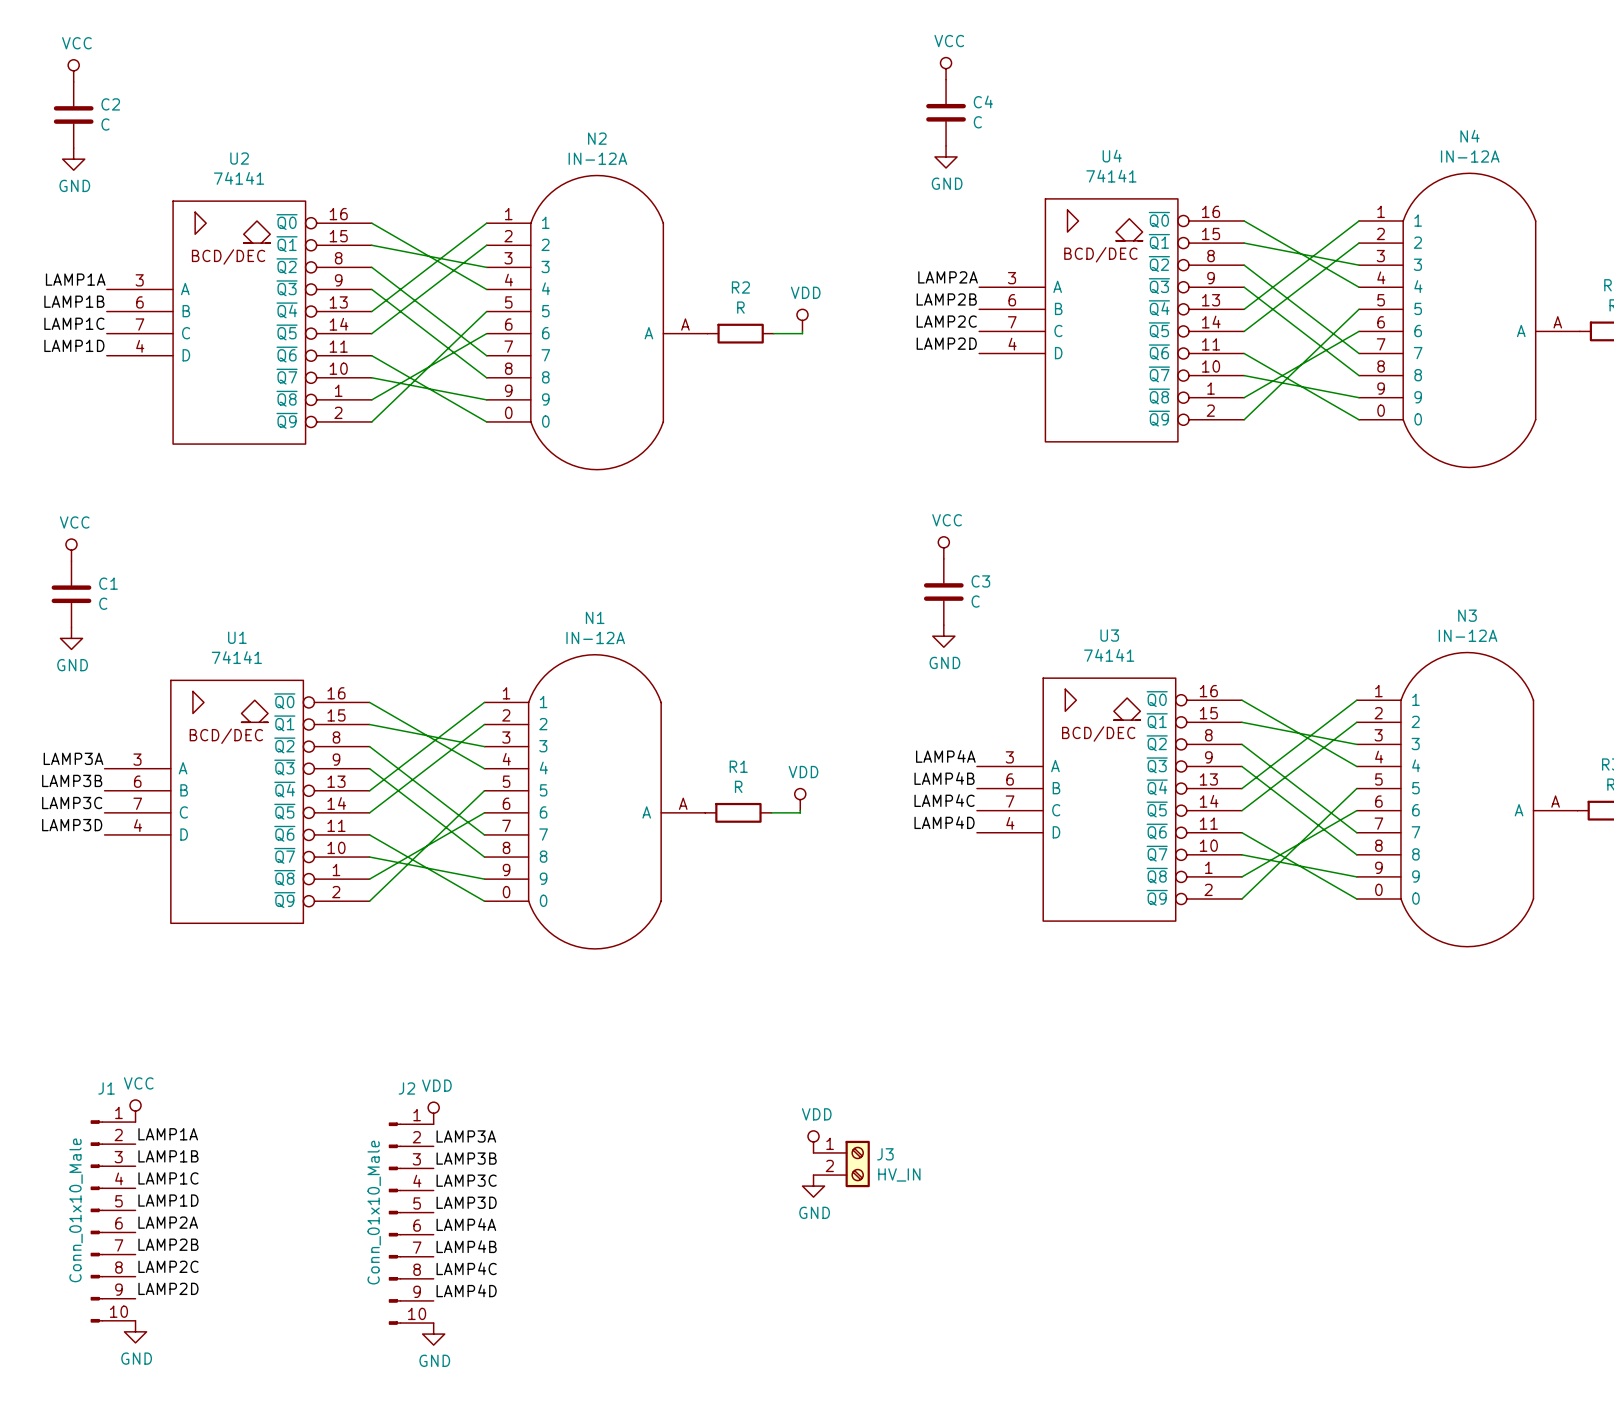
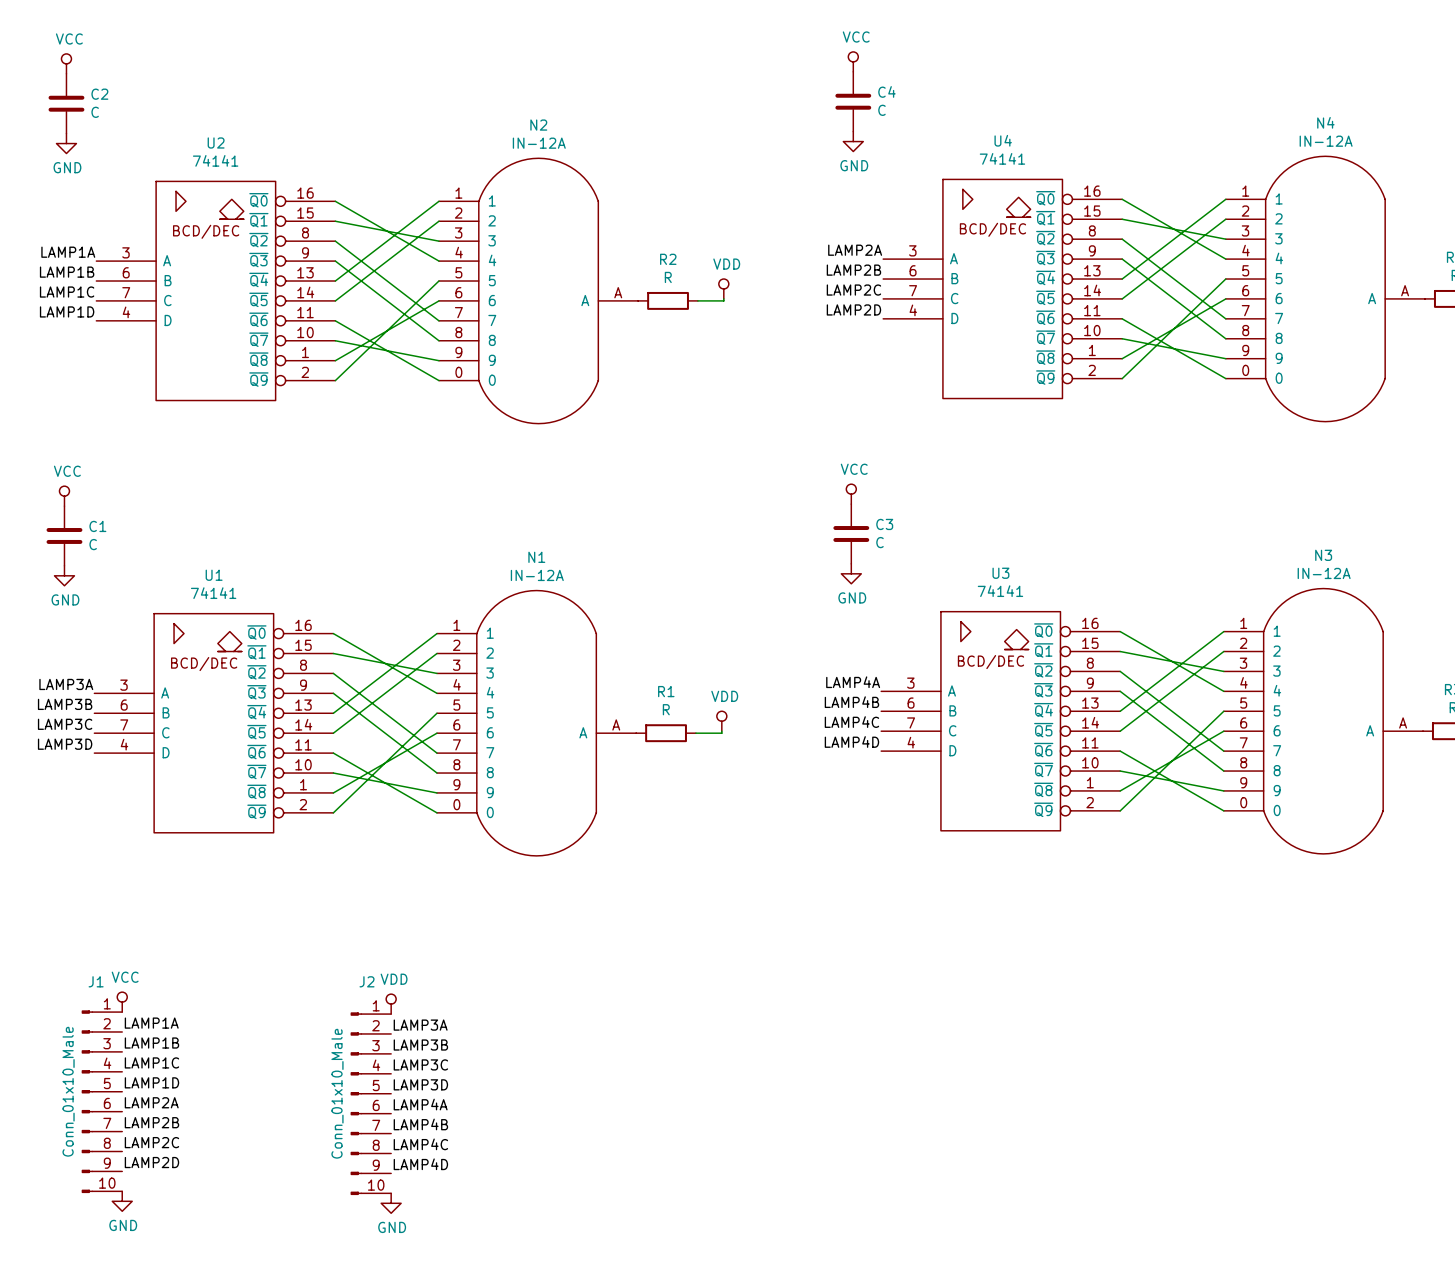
power symbol: VDD (813, 1141) -> none
J3: HV_IN (841, 1164) -> none
power symbol: GND (813, 1186) -> none

